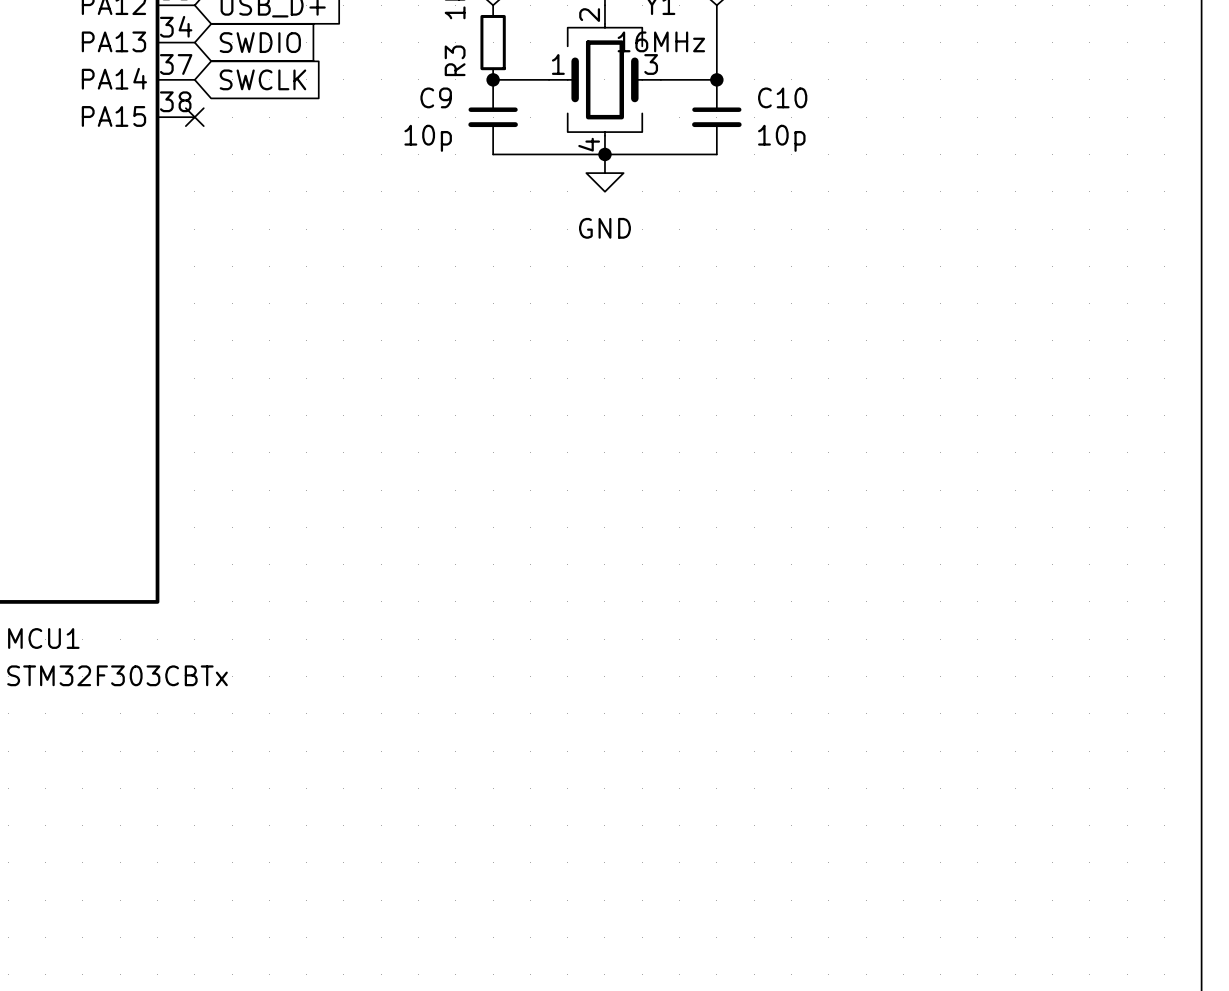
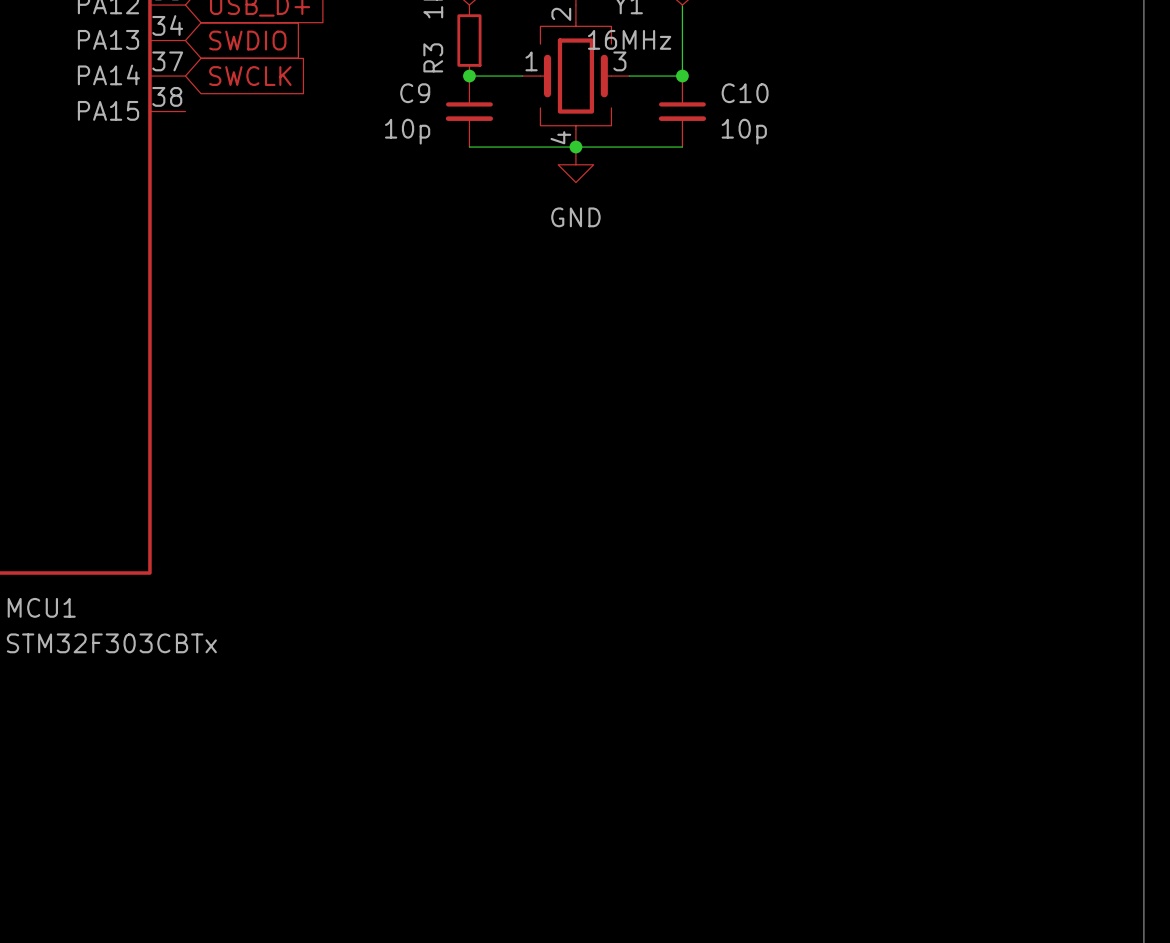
no-connect mark: (194, 117) -> none

